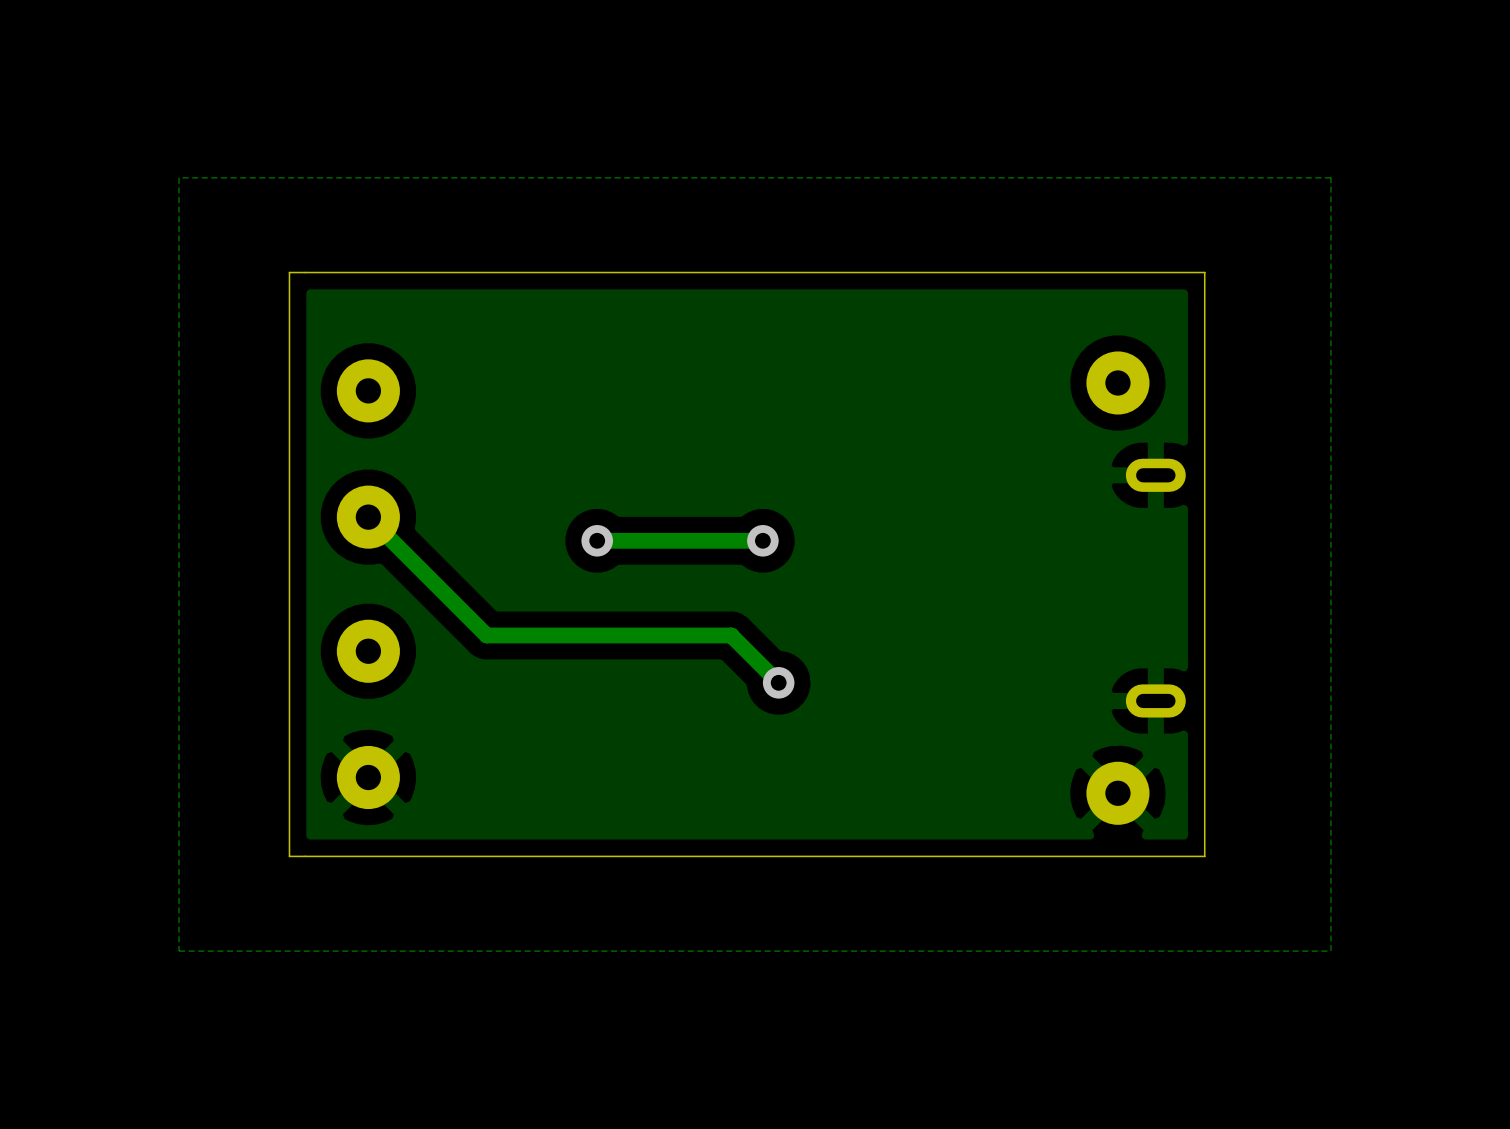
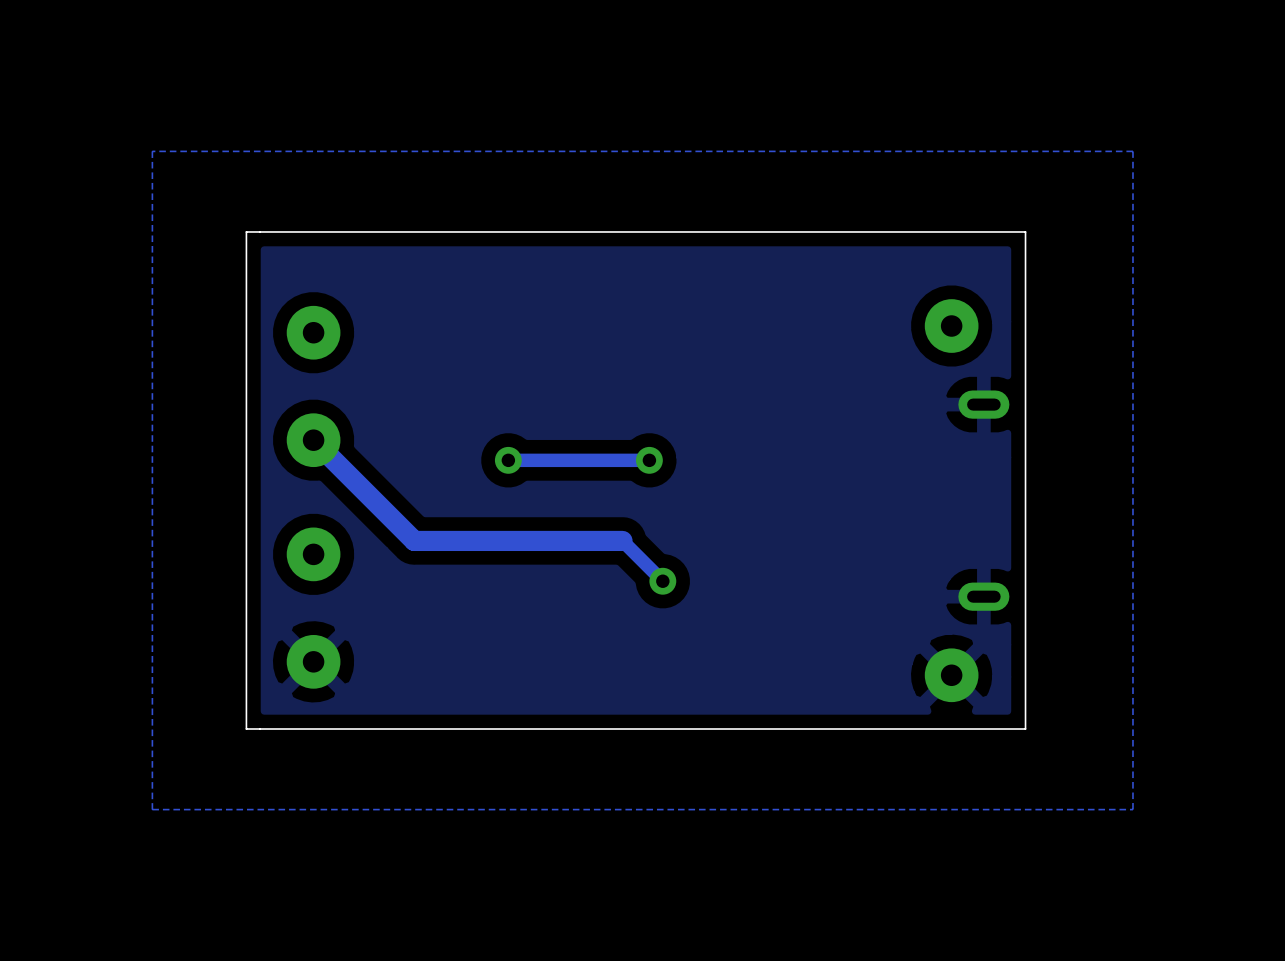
track width: thin (368, 517) (486, 635) (731, 635) -> thick (313, 440) (414, 540) (622, 540)

